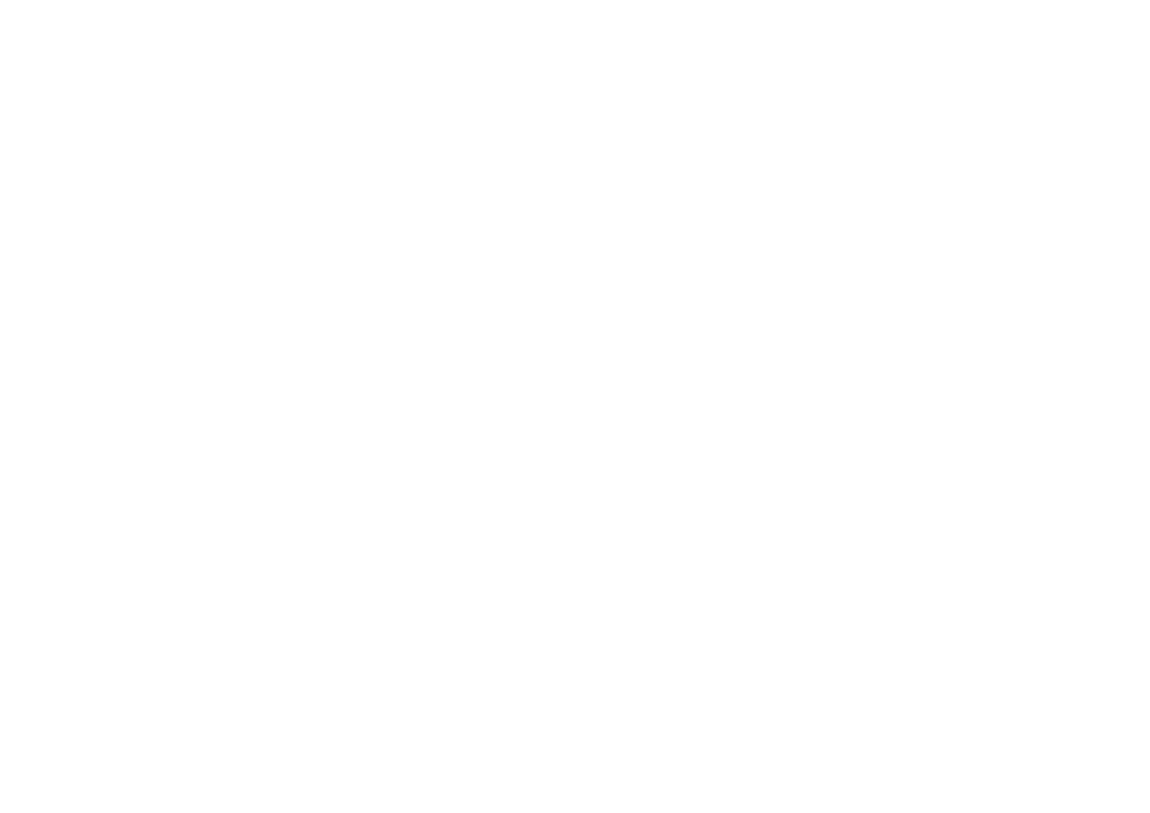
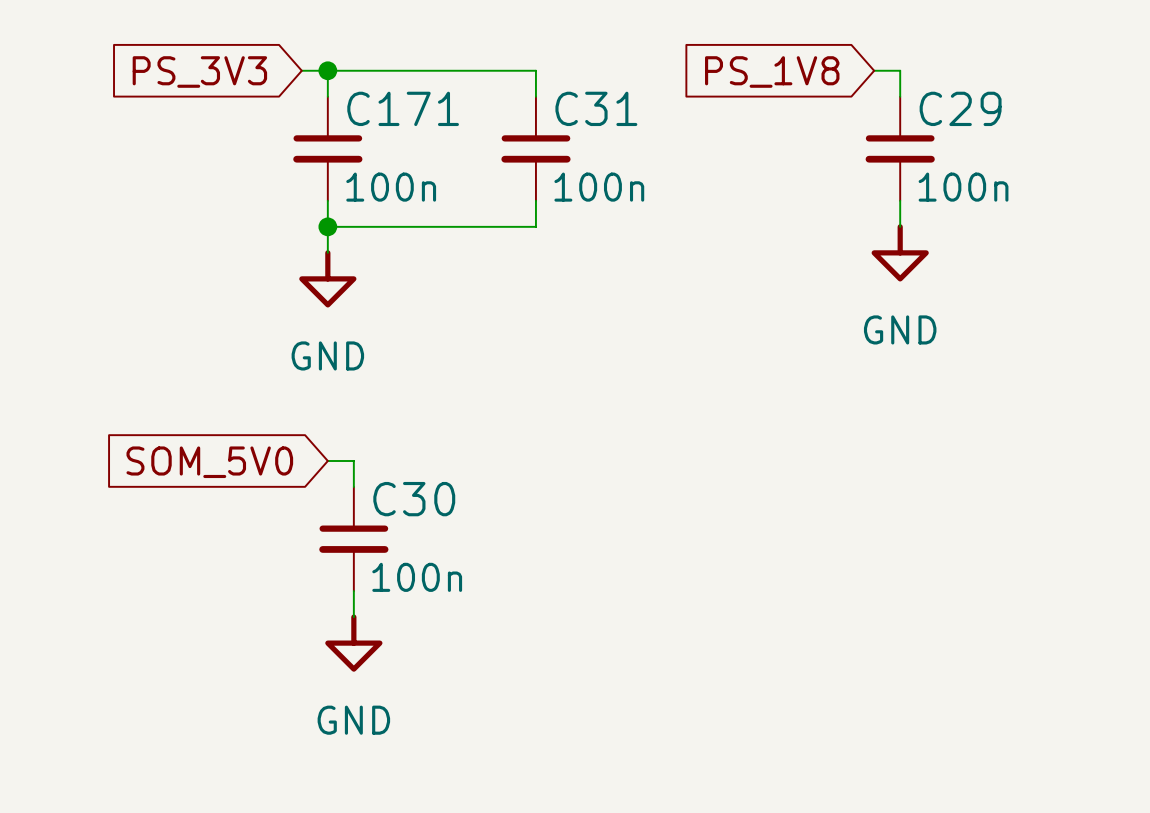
wire: none -> (301, 70) (535, 70) (535, 96)
wire: none -> (327, 70) (327, 96)
junction: none -> (327, 70)
wire: none -> (874, 70) (900, 70) (900, 96)
global label: none -> PS_3V3 (199, 72)
global label: none -> PS_1V8 (772, 72)
C171: none -> (327, 148)
C31: none -> (535, 148)
C29: none -> (900, 148)
wire: none -> (327, 200) (327, 252)
wire: none -> (535, 200) (535, 226) (327, 226)
wire: none -> (900, 200) (900, 226)
junction: none -> (327, 226)
power symbol: none -> GND (900, 252)
power symbol: none -> GND (327, 278)
wire: none -> (327, 461) (353, 461) (353, 487)
global label: none -> SOM_5V0 (209, 462)
C30: none -> (353, 539)
wire: none -> (353, 591) (353, 617)
power symbol: none -> GND (353, 643)

